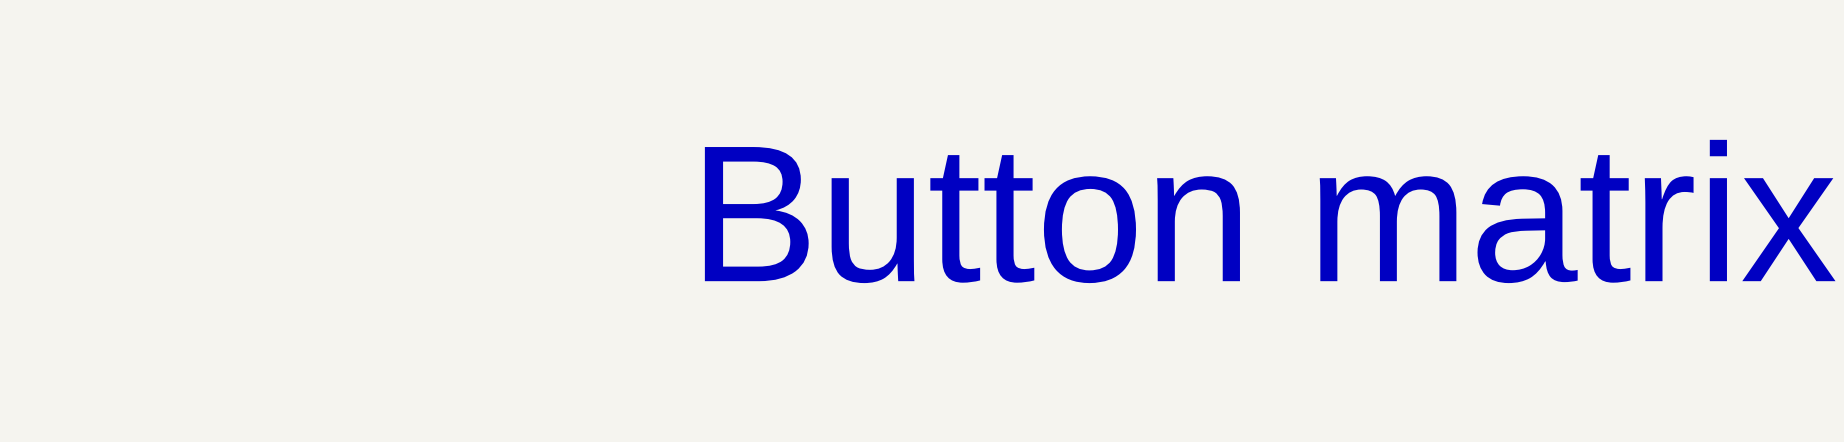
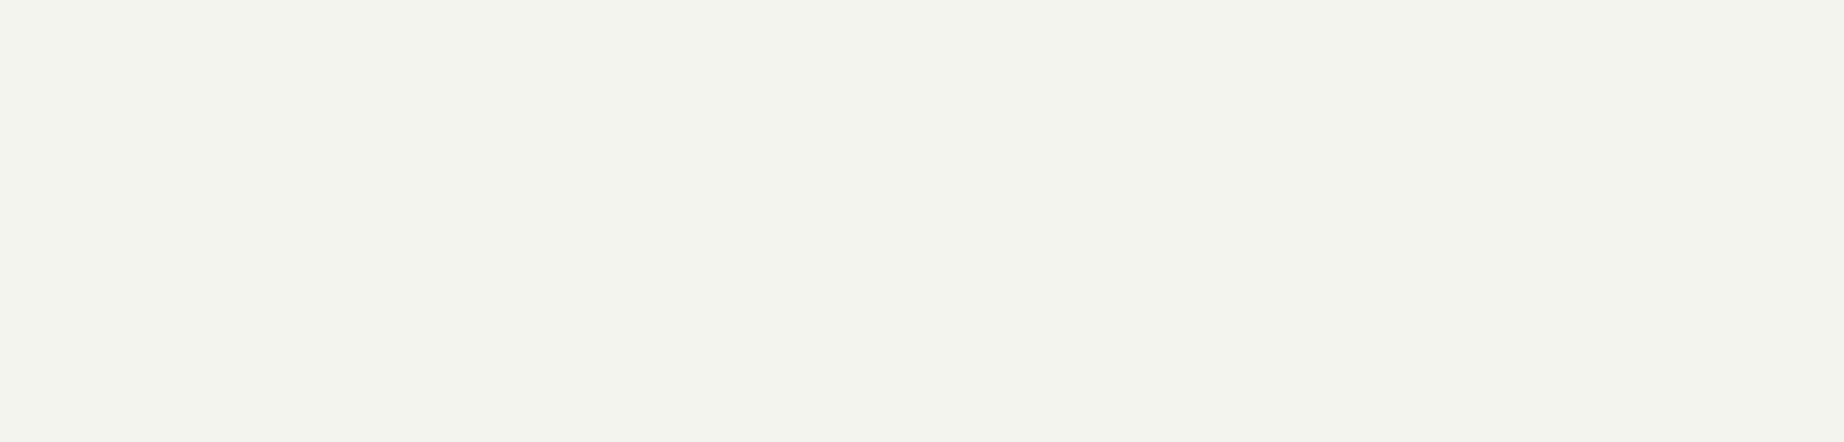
text: Button matrix (1270, 211) -> none

